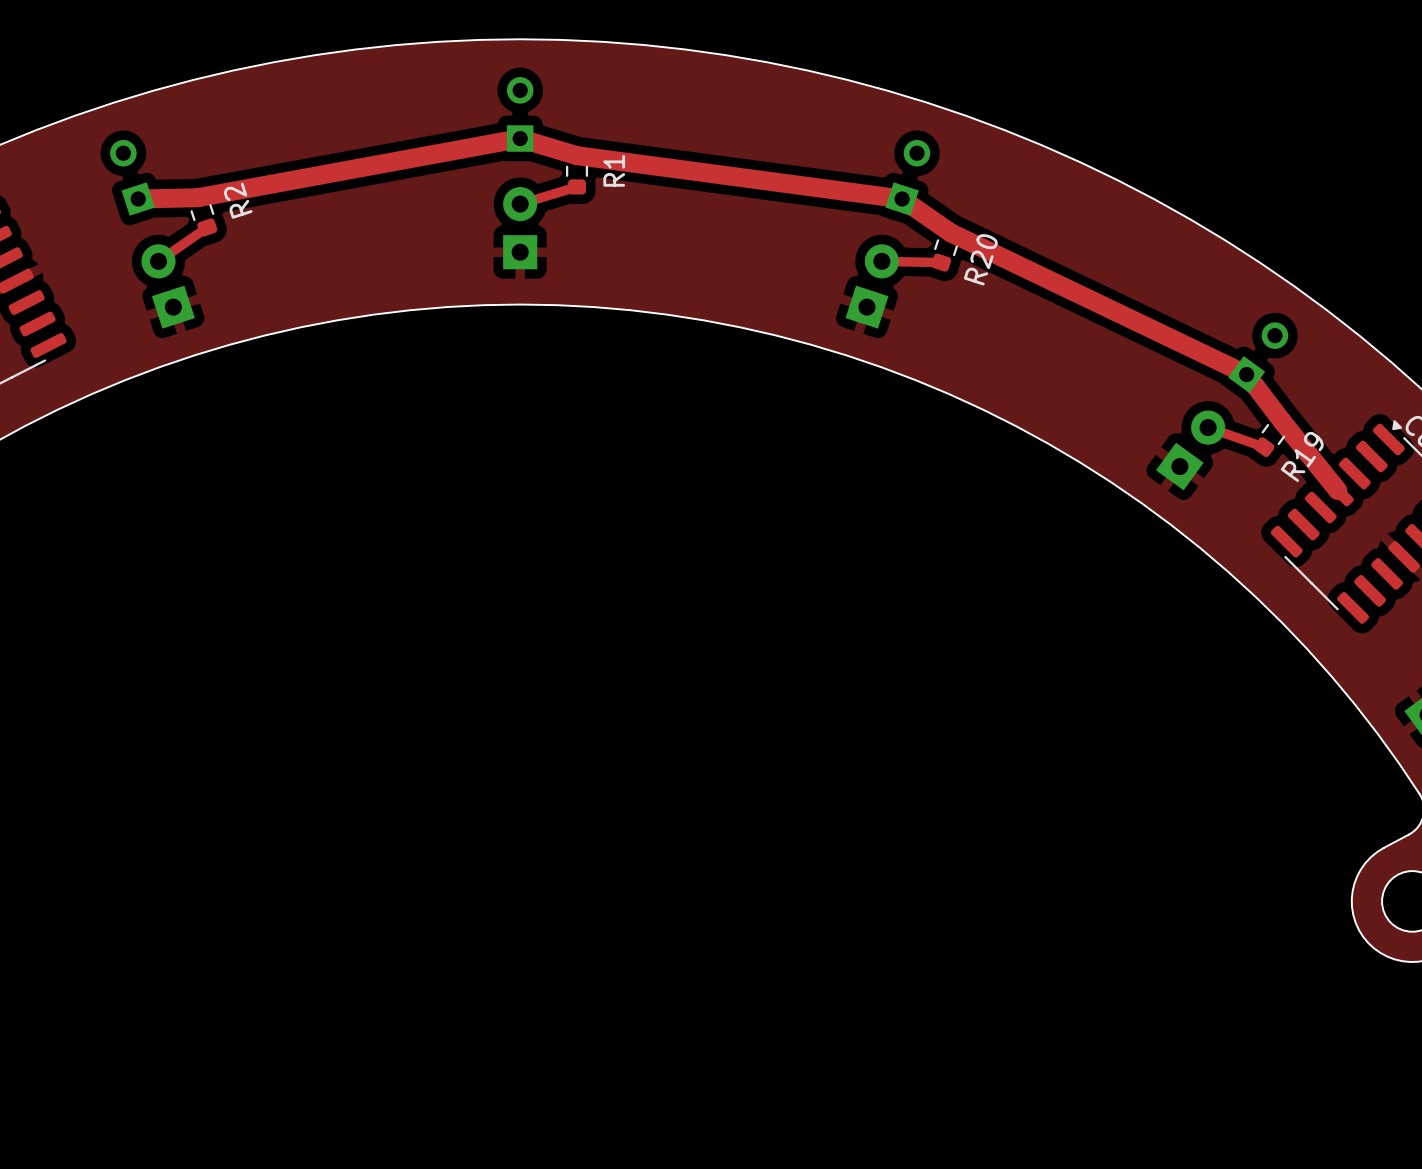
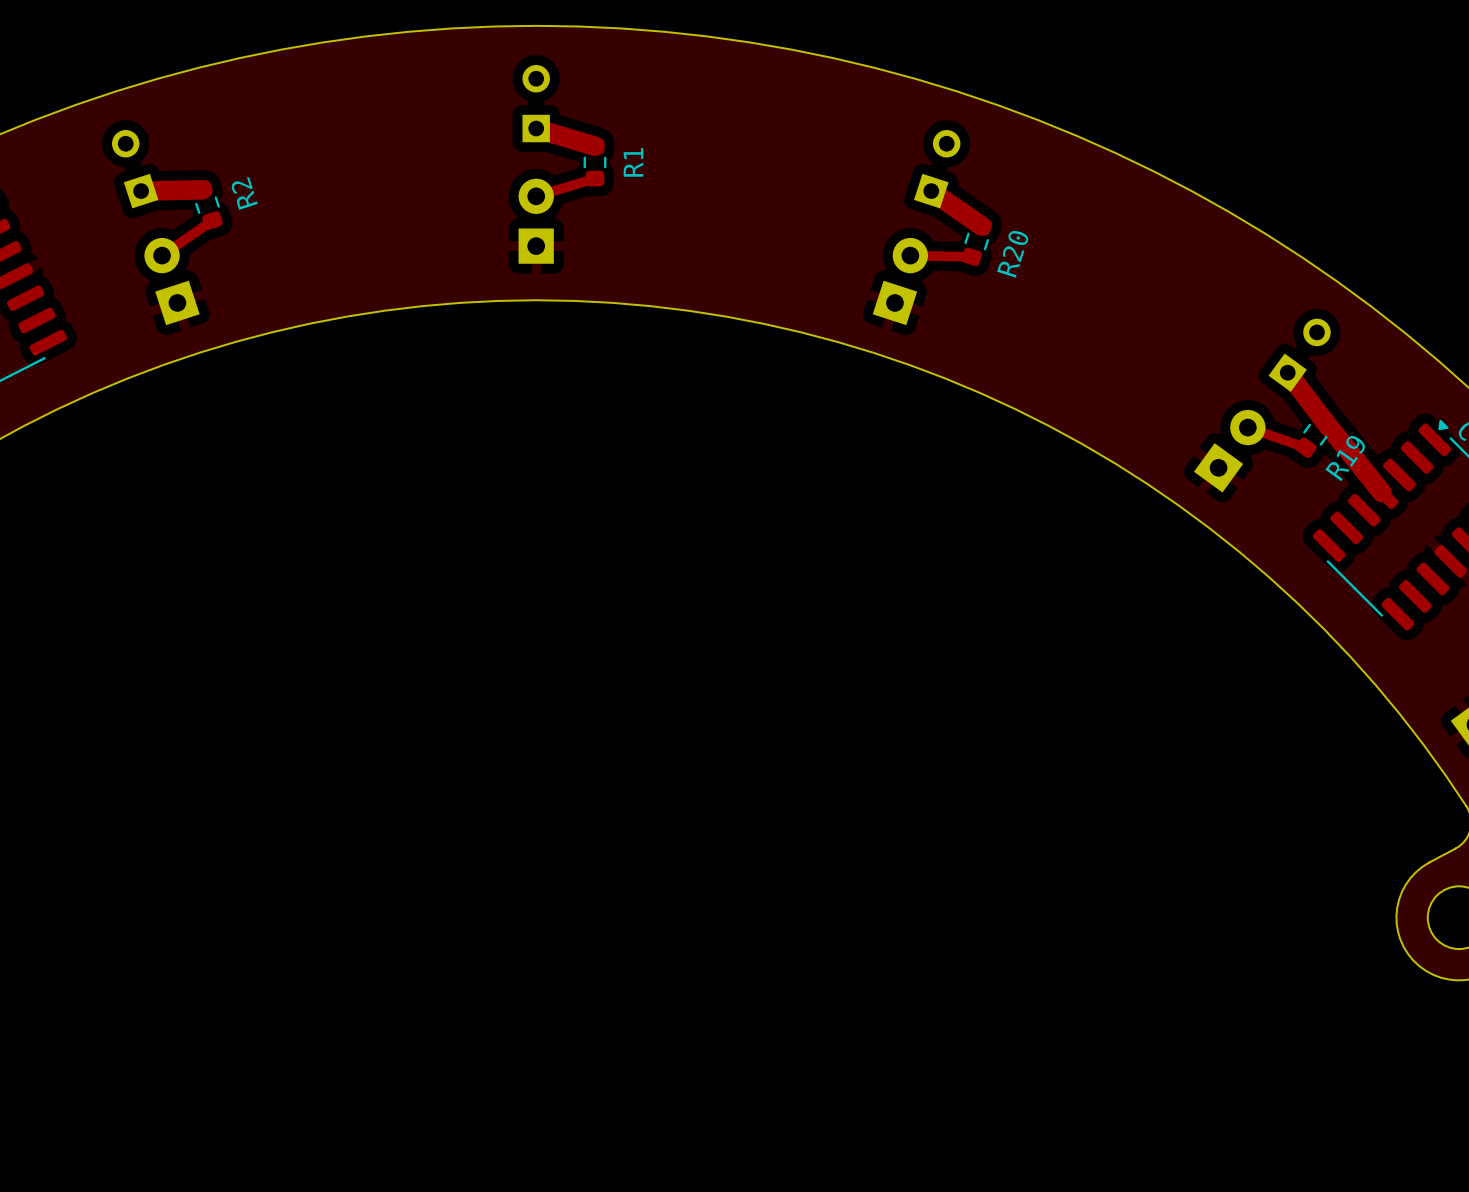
track: (520, 138) (197, 197) -> none
track: (577, 155) (902, 199) -> none
track: (950, 232) (1246, 374) -> none

